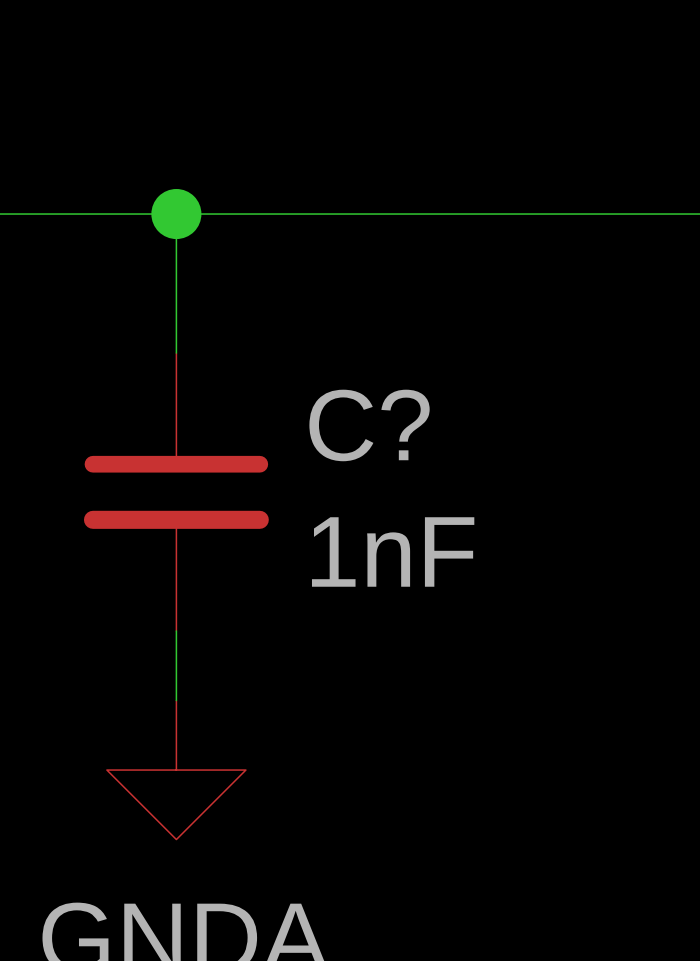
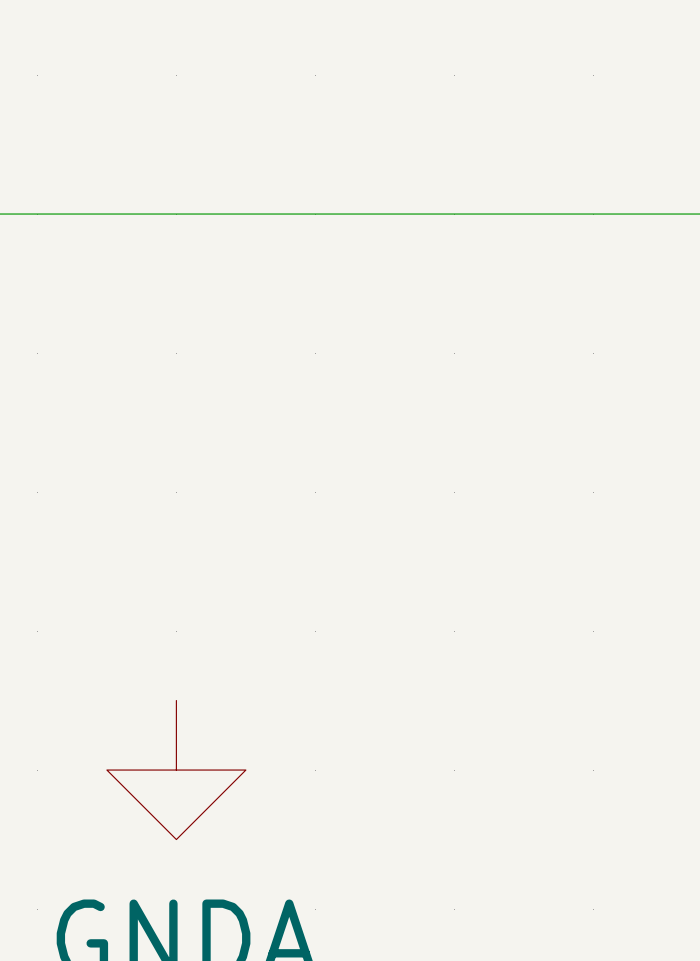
wire: (176, 214) (176, 353) -> none
junction: (176, 214) -> none
C?: 1nF (176, 492) -> none
wire: (176, 631) (176, 700) -> none

